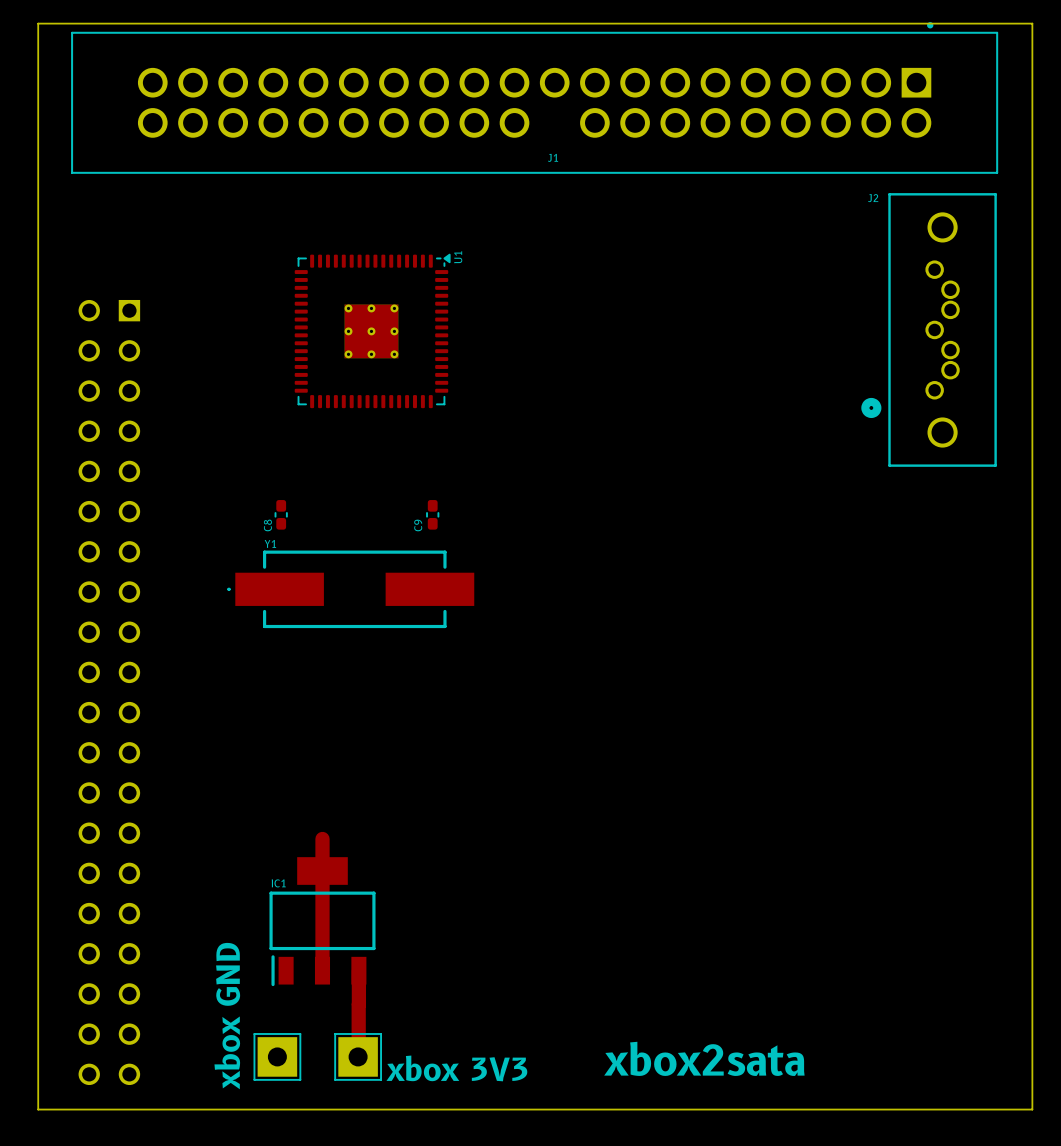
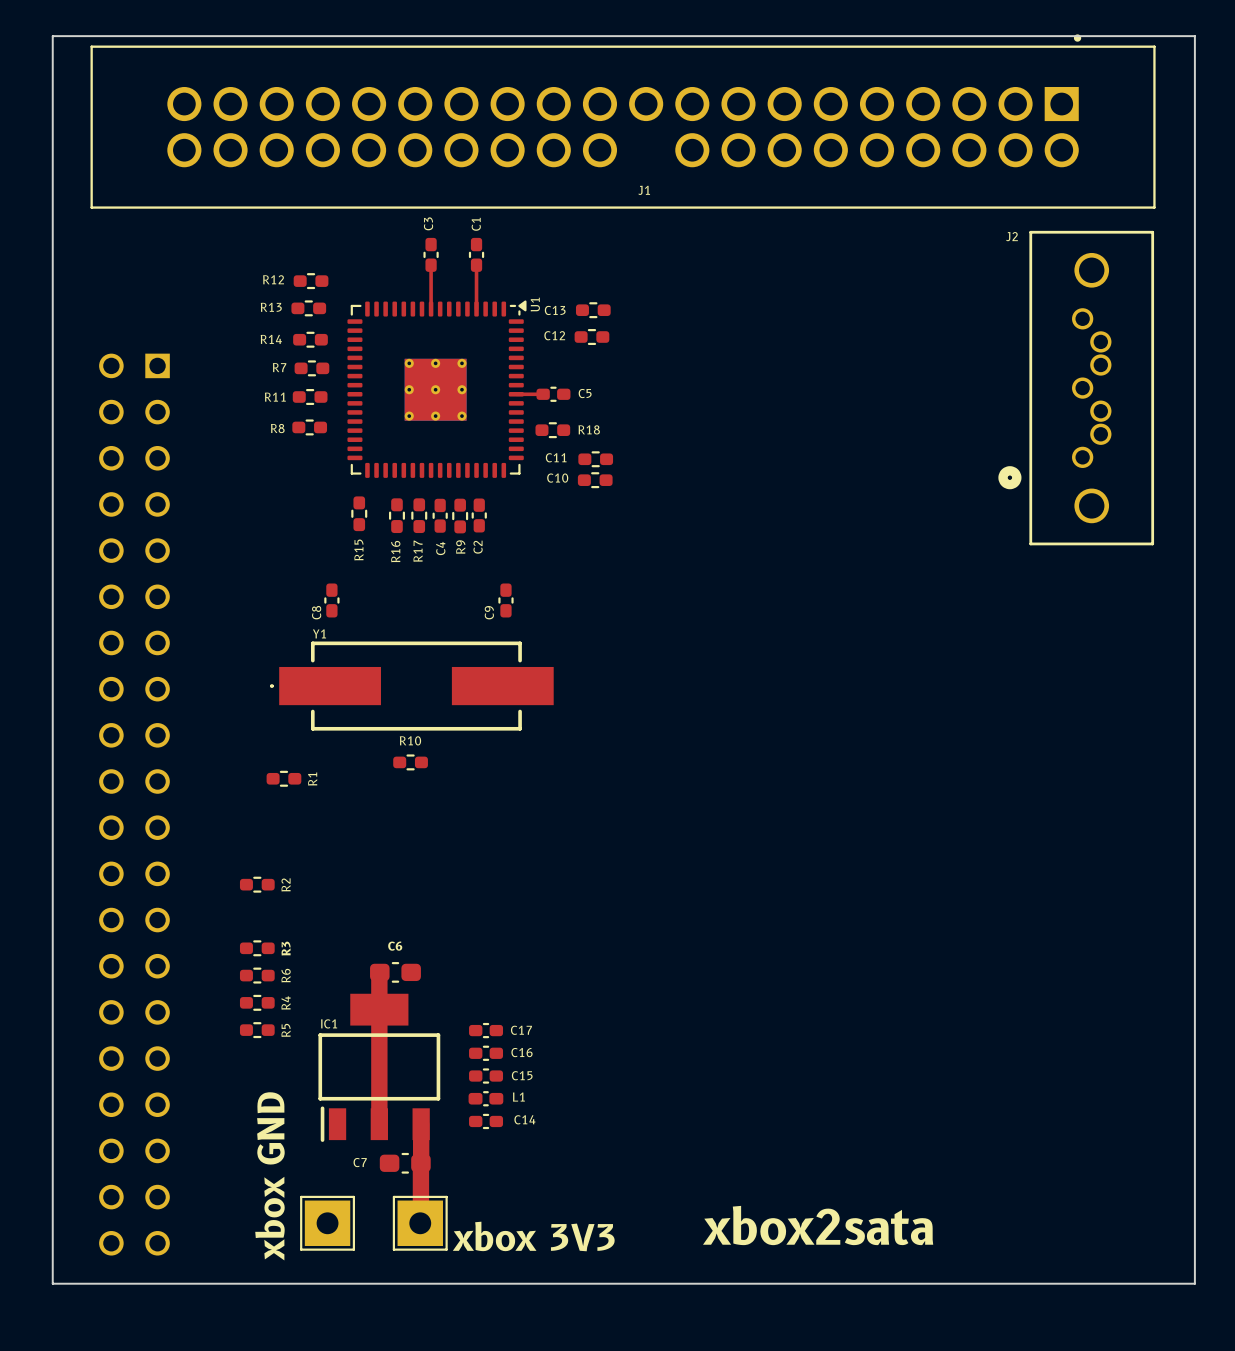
C3: none -> (431, 254)
C1: none -> (476, 254)
top track: none -> (431, 265) (431, 309)
top track: none -> (476, 265) (476, 309)
R12: none -> (311, 281)
R13: none -> (308, 308)
C13: none -> (593, 310)
C12: none -> (591, 337)
R14: none -> (310, 339)
R7: none -> (311, 368)
top track: none -> (516, 394) (543, 394)
C5: none -> (553, 394)
R11: none -> (310, 397)
R8: none -> (309, 427)
R18: none -> (552, 430)
C11: none -> (595, 459)
C10: none -> (595, 480)
R15: none -> (359, 513)
C2: none -> (479, 515)
R16: none -> (396, 515)
R17: none -> (419, 515)
C4: none -> (440, 515)
R9: none -> (460, 516)
R10: none -> (410, 762)
R1: none -> (283, 778)
R2: none -> (257, 884)
R3: none -> (257, 948)
C6: none -> (395, 972)
R6: none -> (257, 975)
R4: none -> (257, 1002)
R5: none -> (257, 1030)
C17: none -> (486, 1030)
C16: none -> (486, 1053)
C15: none -> (486, 1076)
L1: none -> (485, 1098)
C14: none -> (486, 1121)
C7: none -> (405, 1163)

